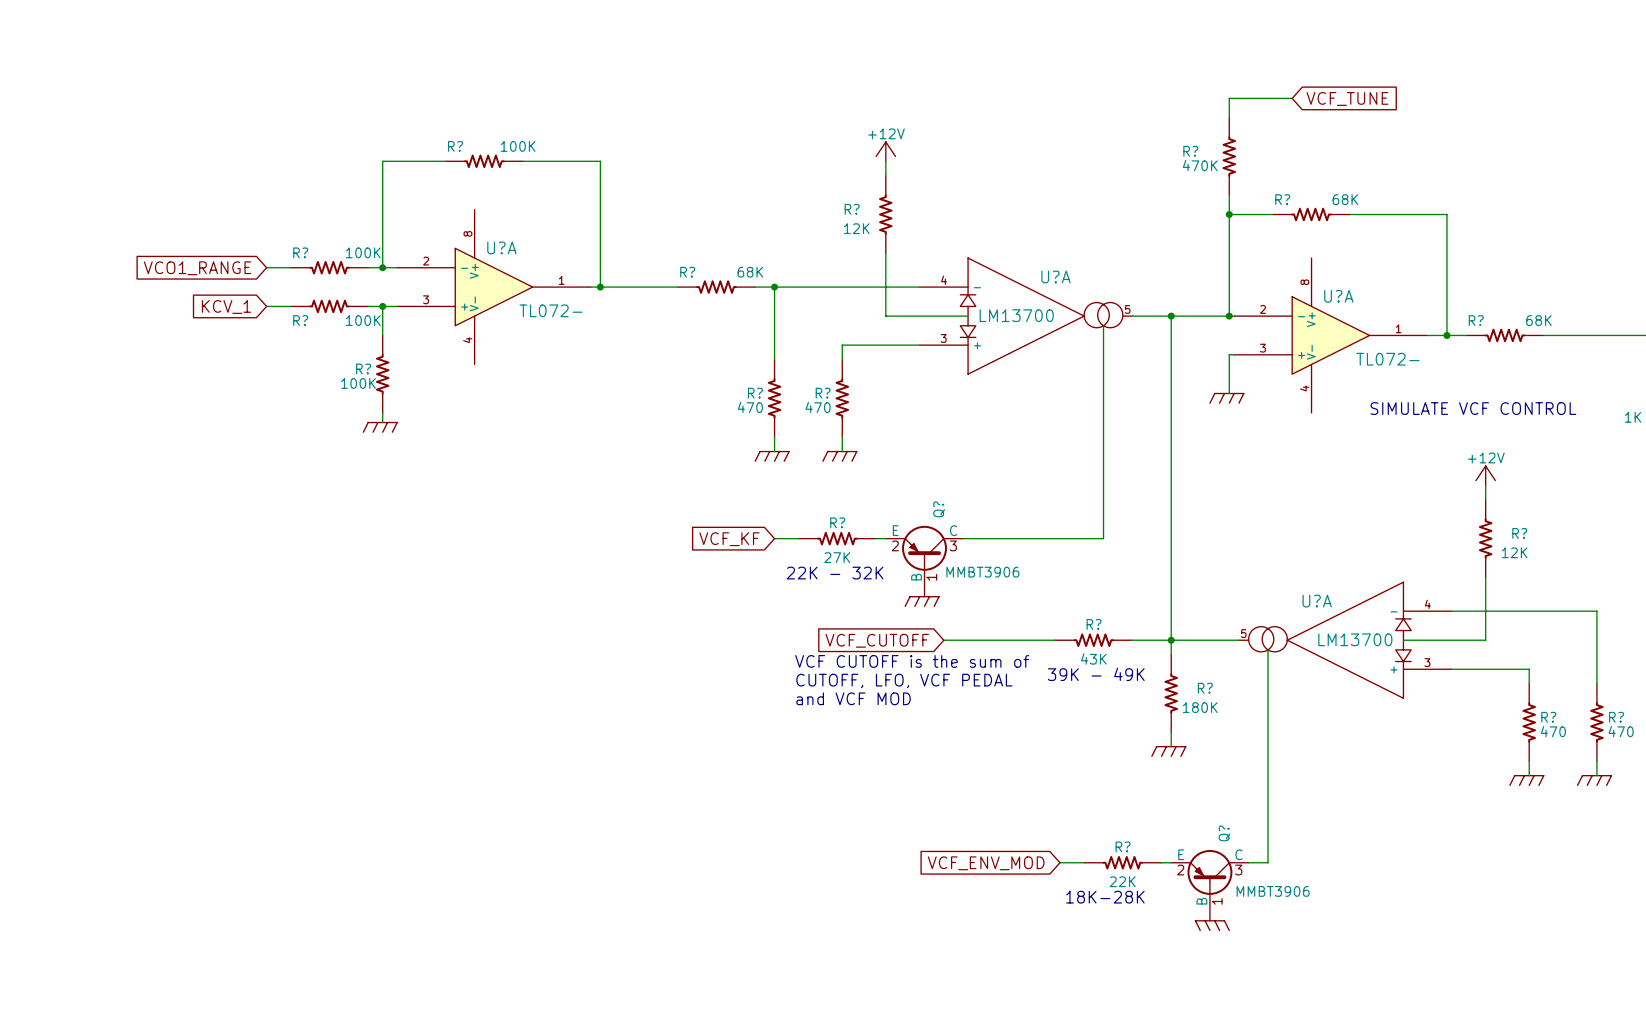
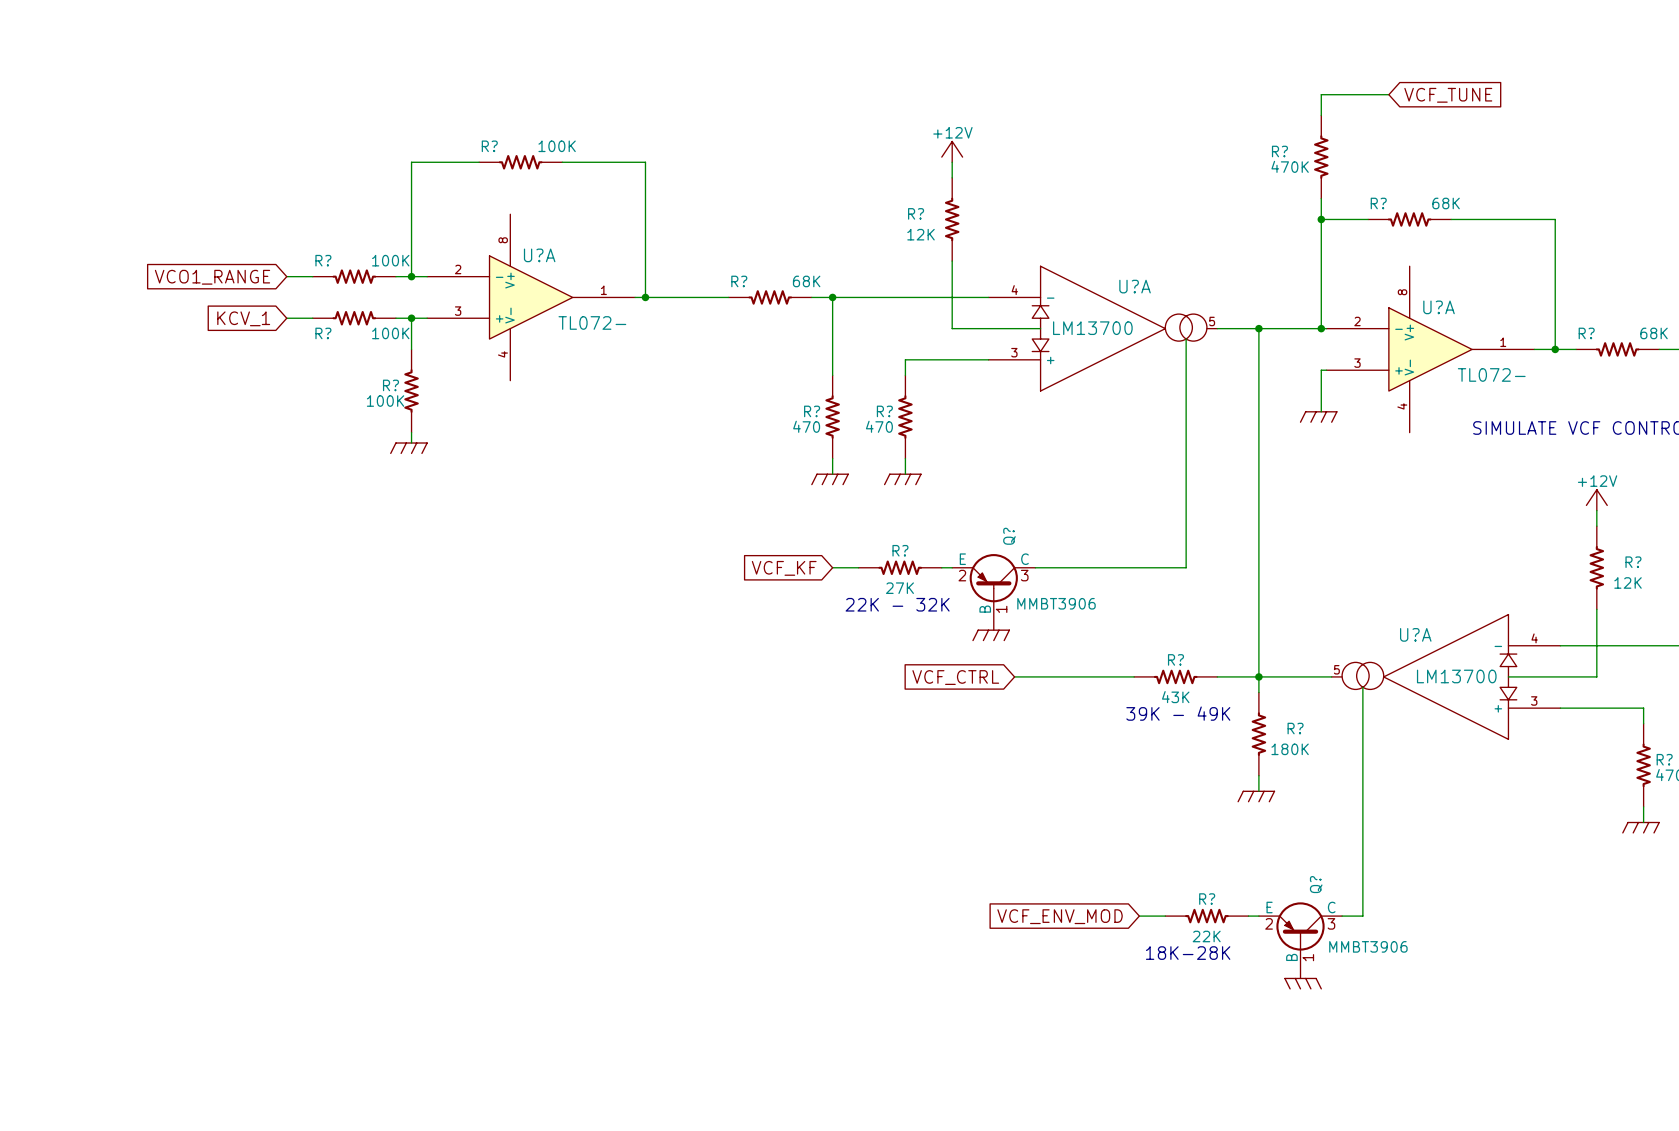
global label: VCF_CUTOFF (877, 640) -> VCF_CTRL (955, 677)
text: VCF CUTOFF is the sum of (912, 661) -> none
text: CUTOFF, LFO, VCF PEDAL (904, 680) -> none
text: and VCF MOD (853, 698) -> none

